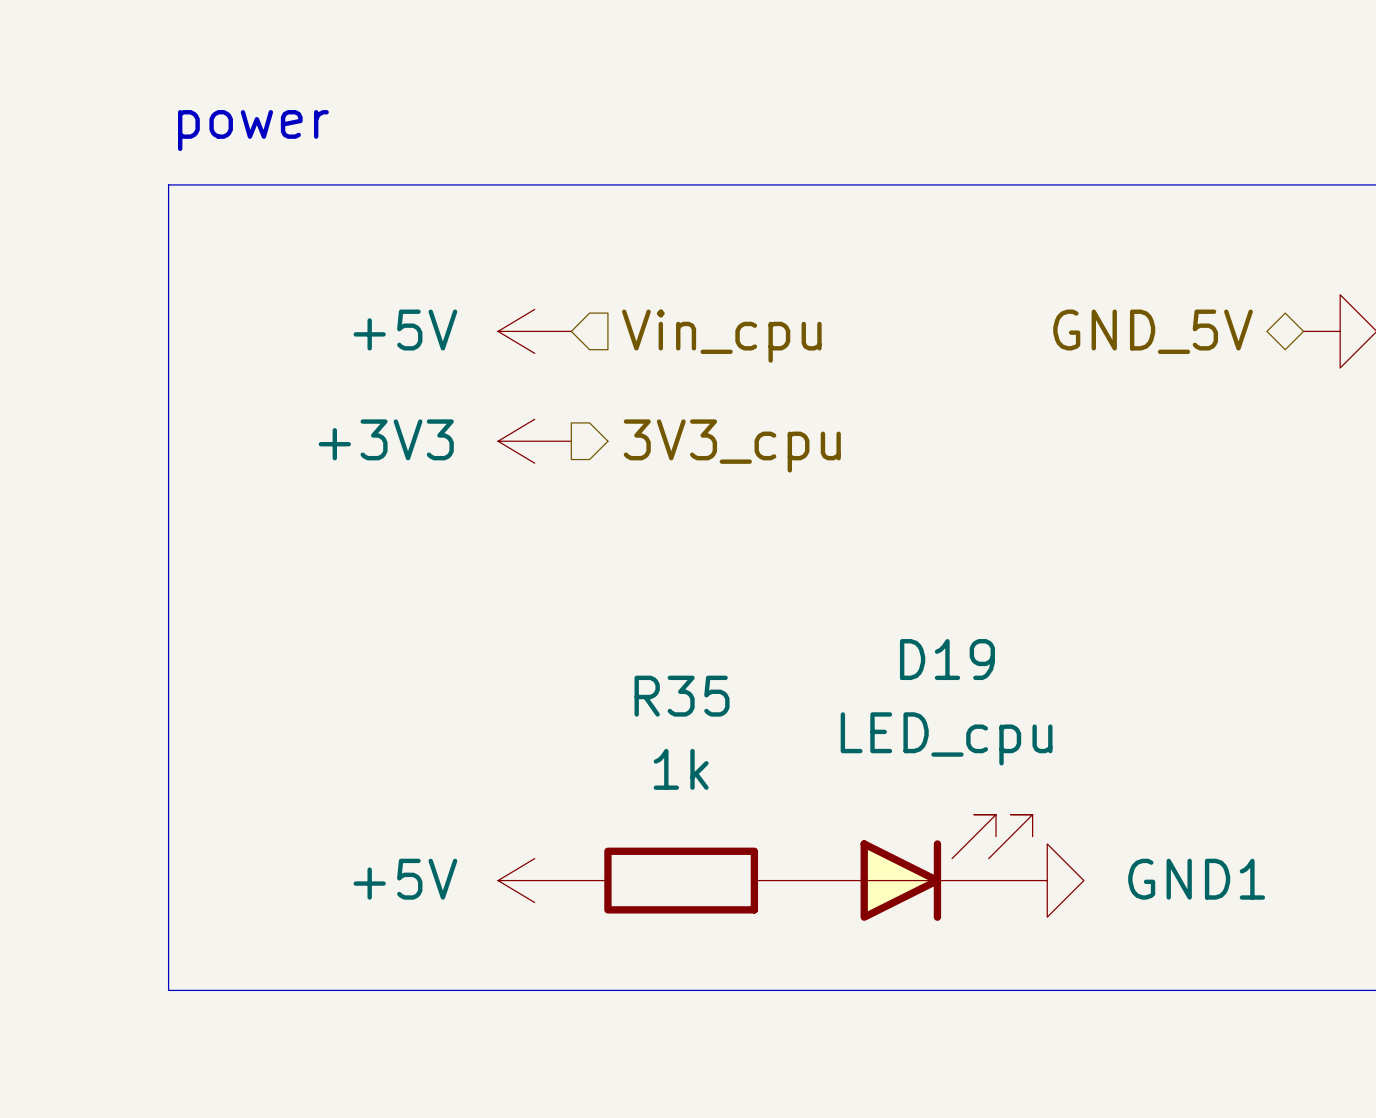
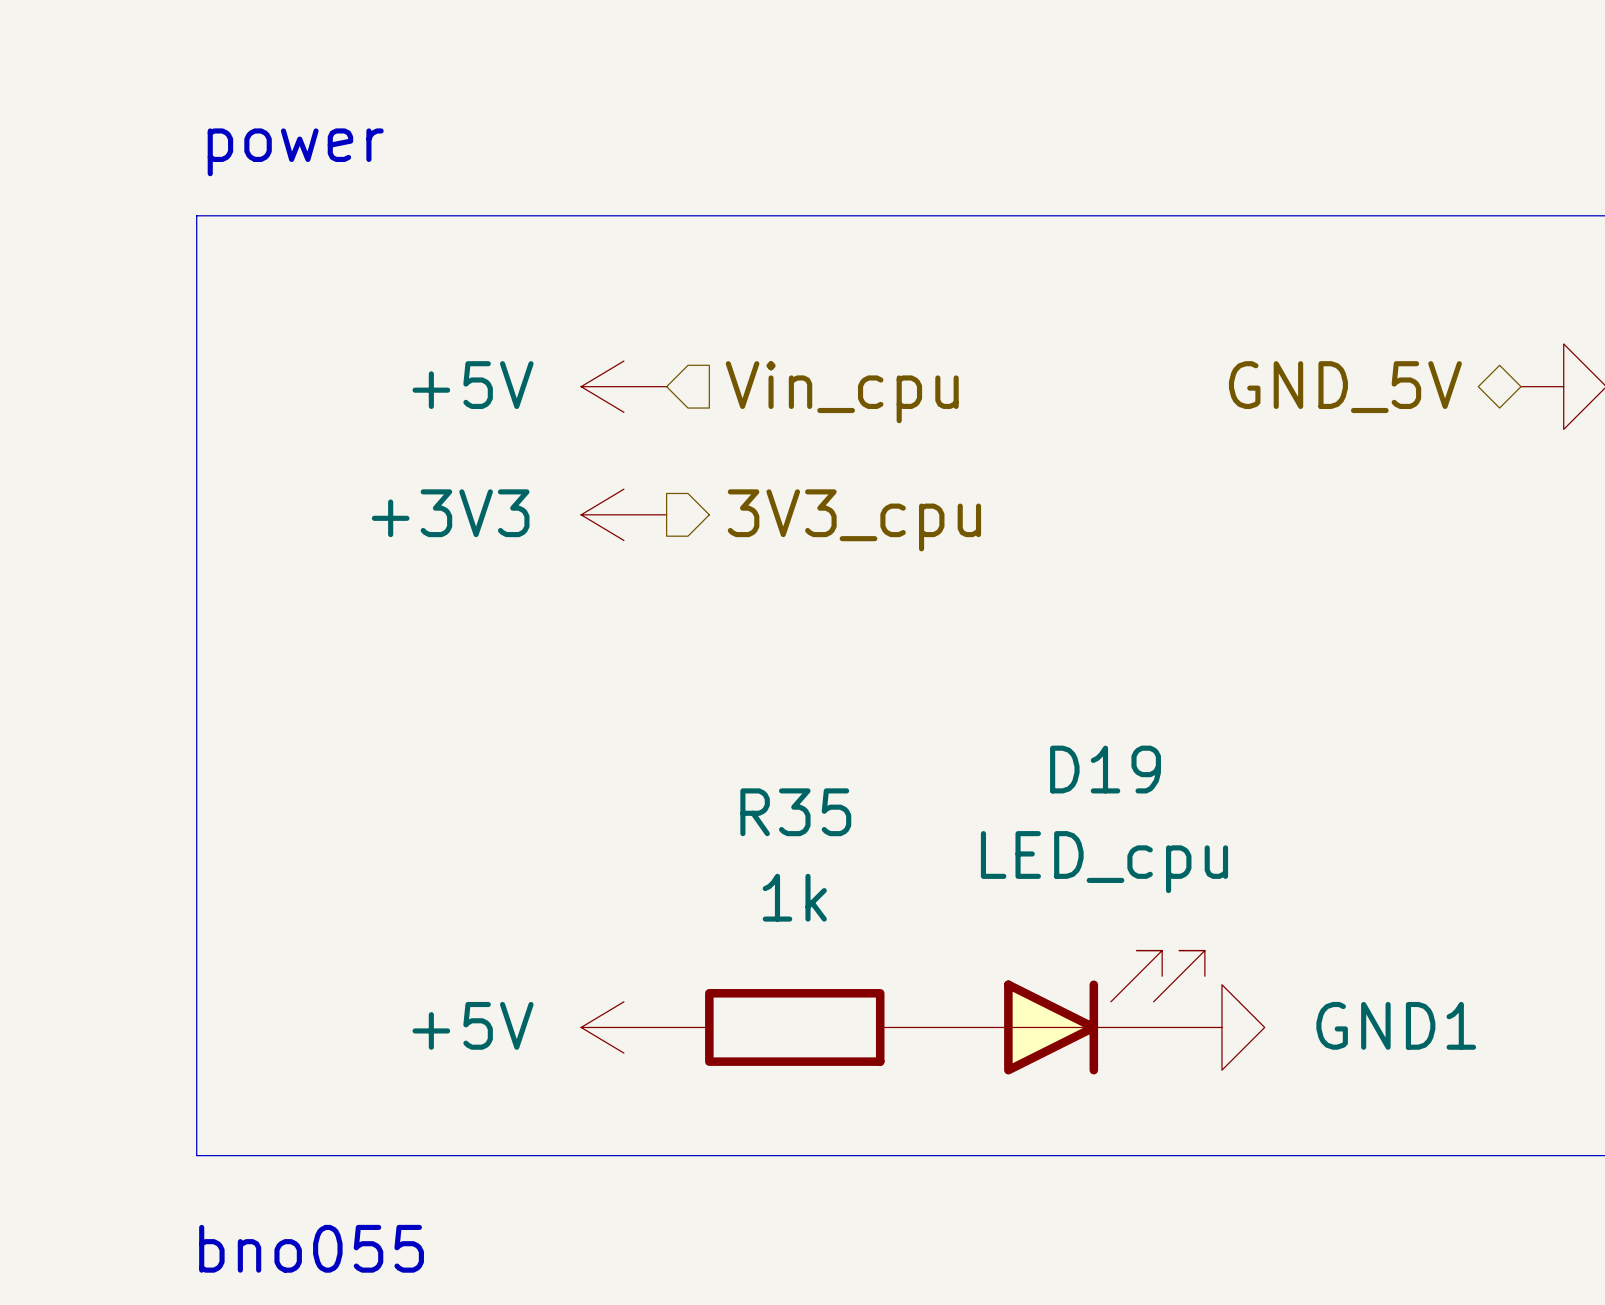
text: none -> bno055 (311, 1248)

